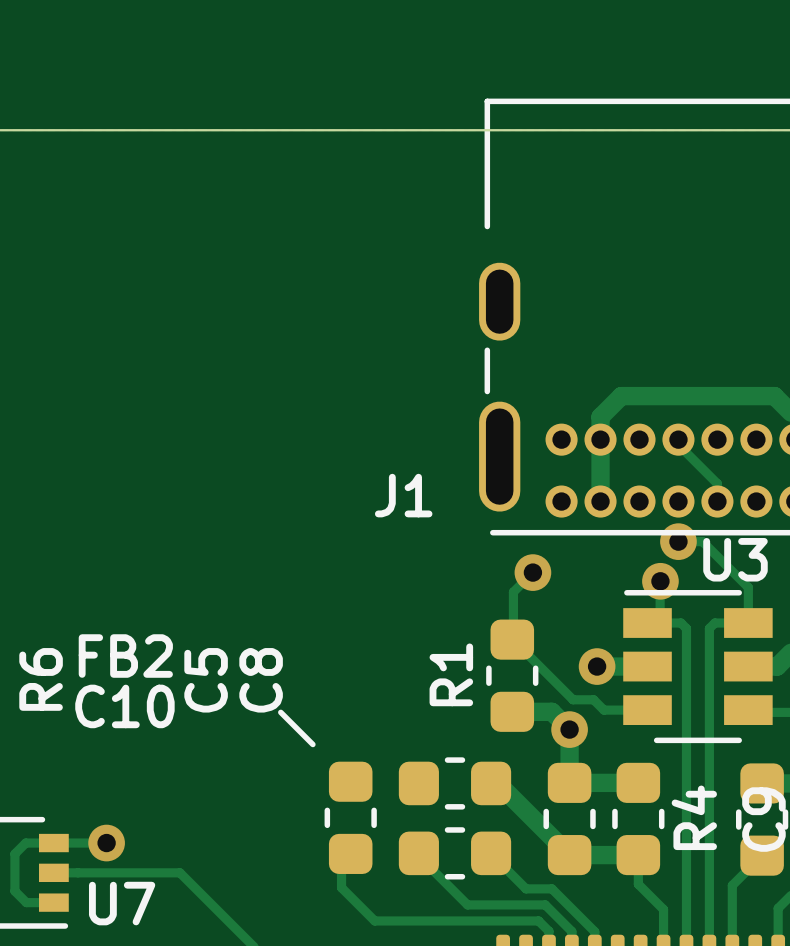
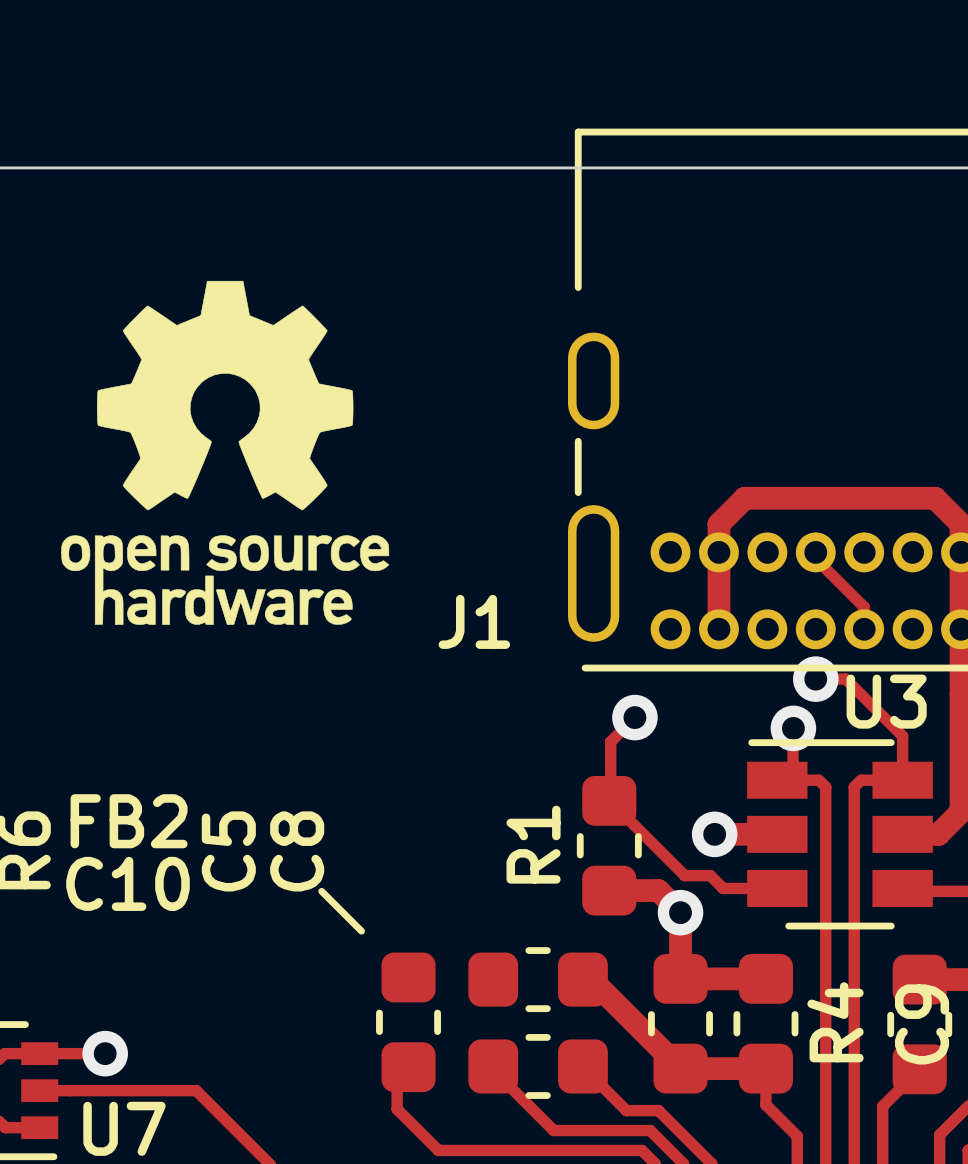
drawing: none -> [61, 280, 390, 625]

